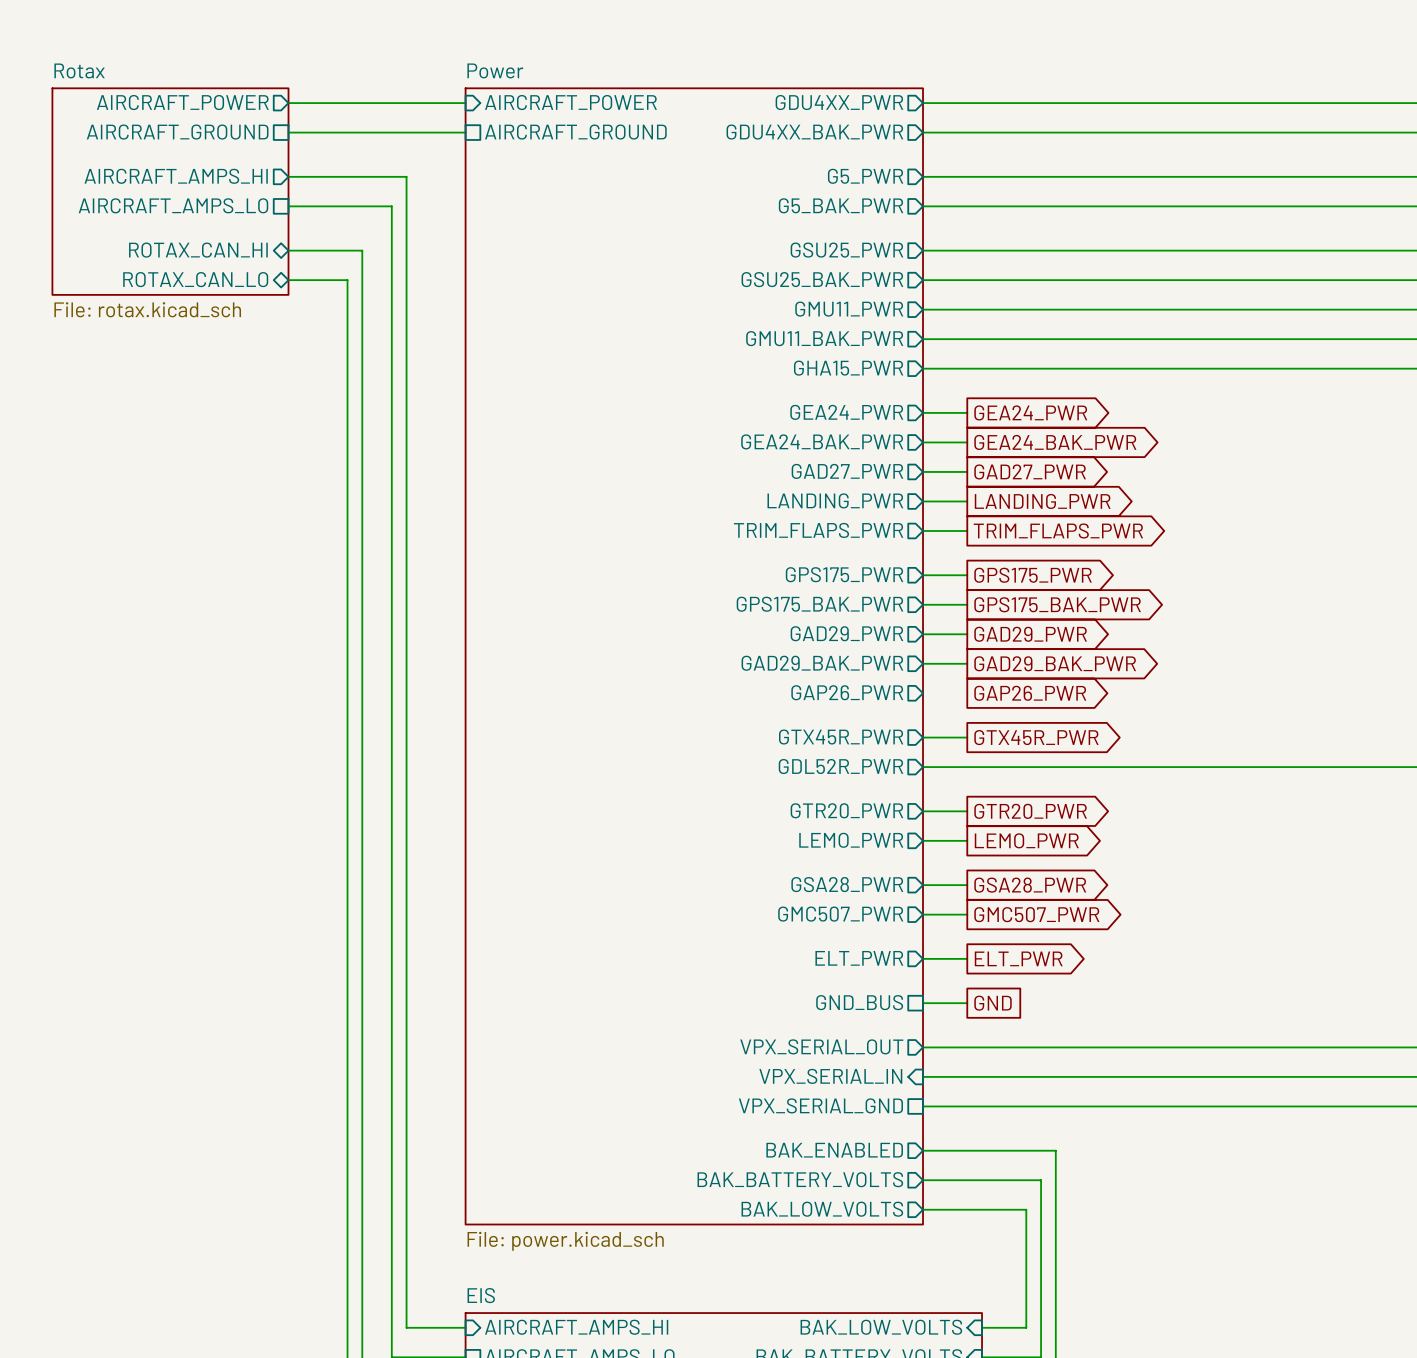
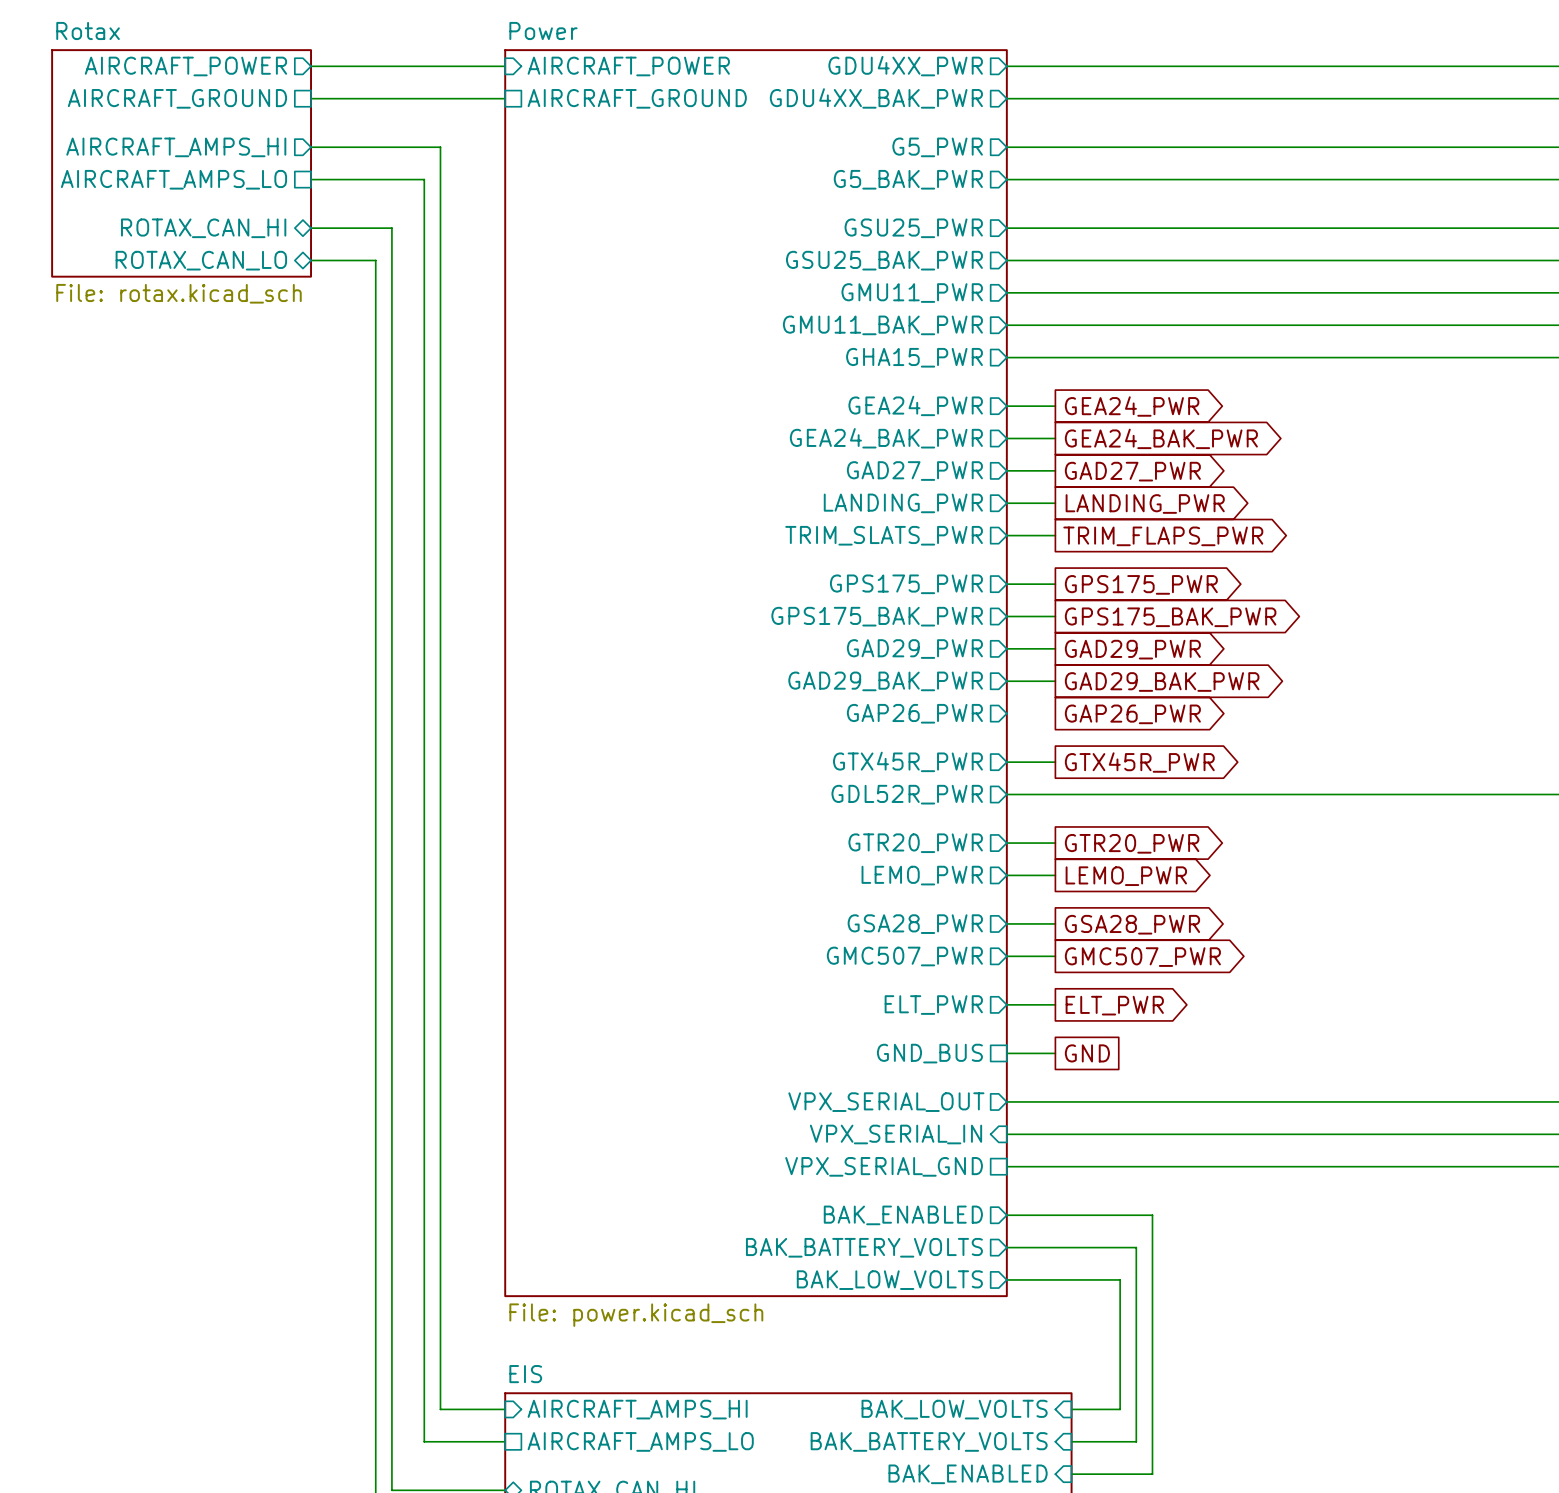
sheet pin: TRIM_FLAPS_PWR (818, 530) -> TRIM_SLATS_PWR (884, 535)

